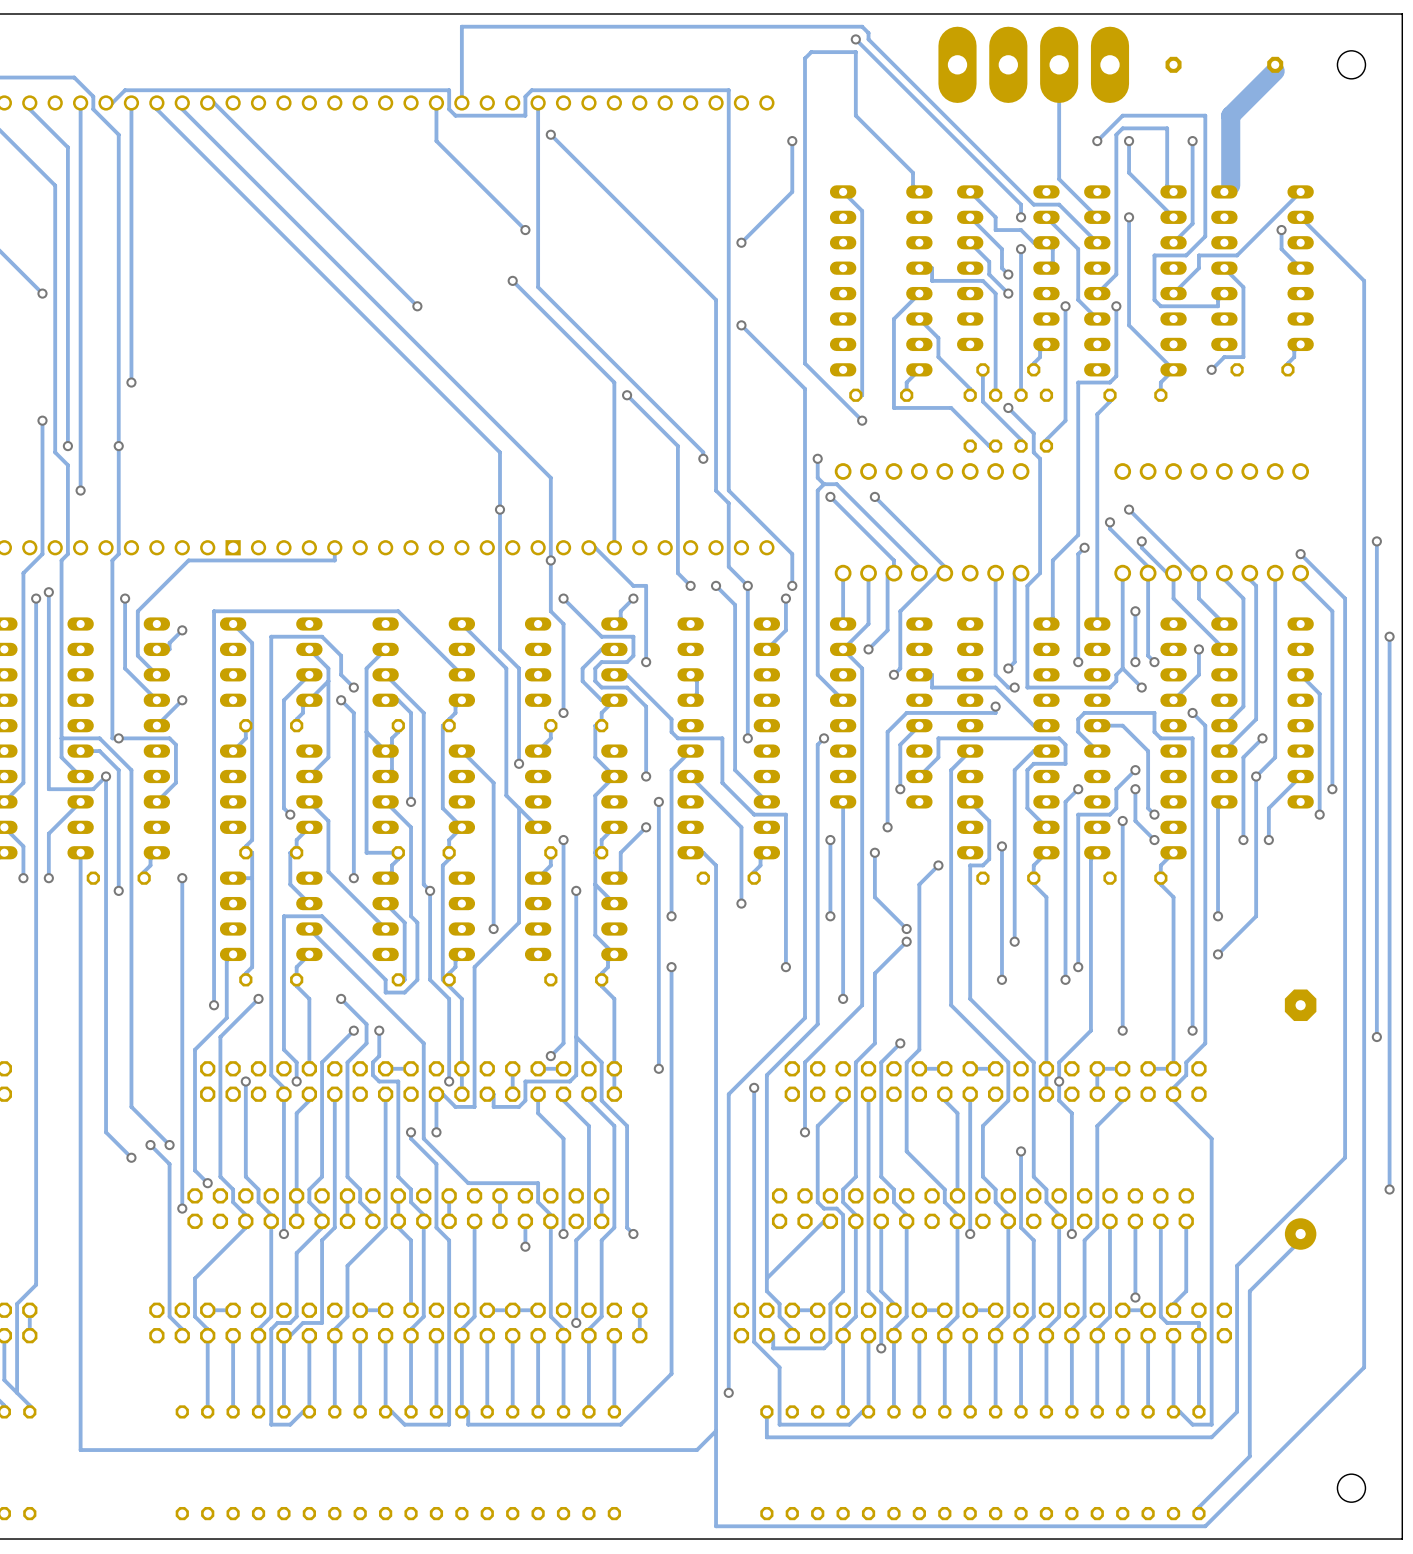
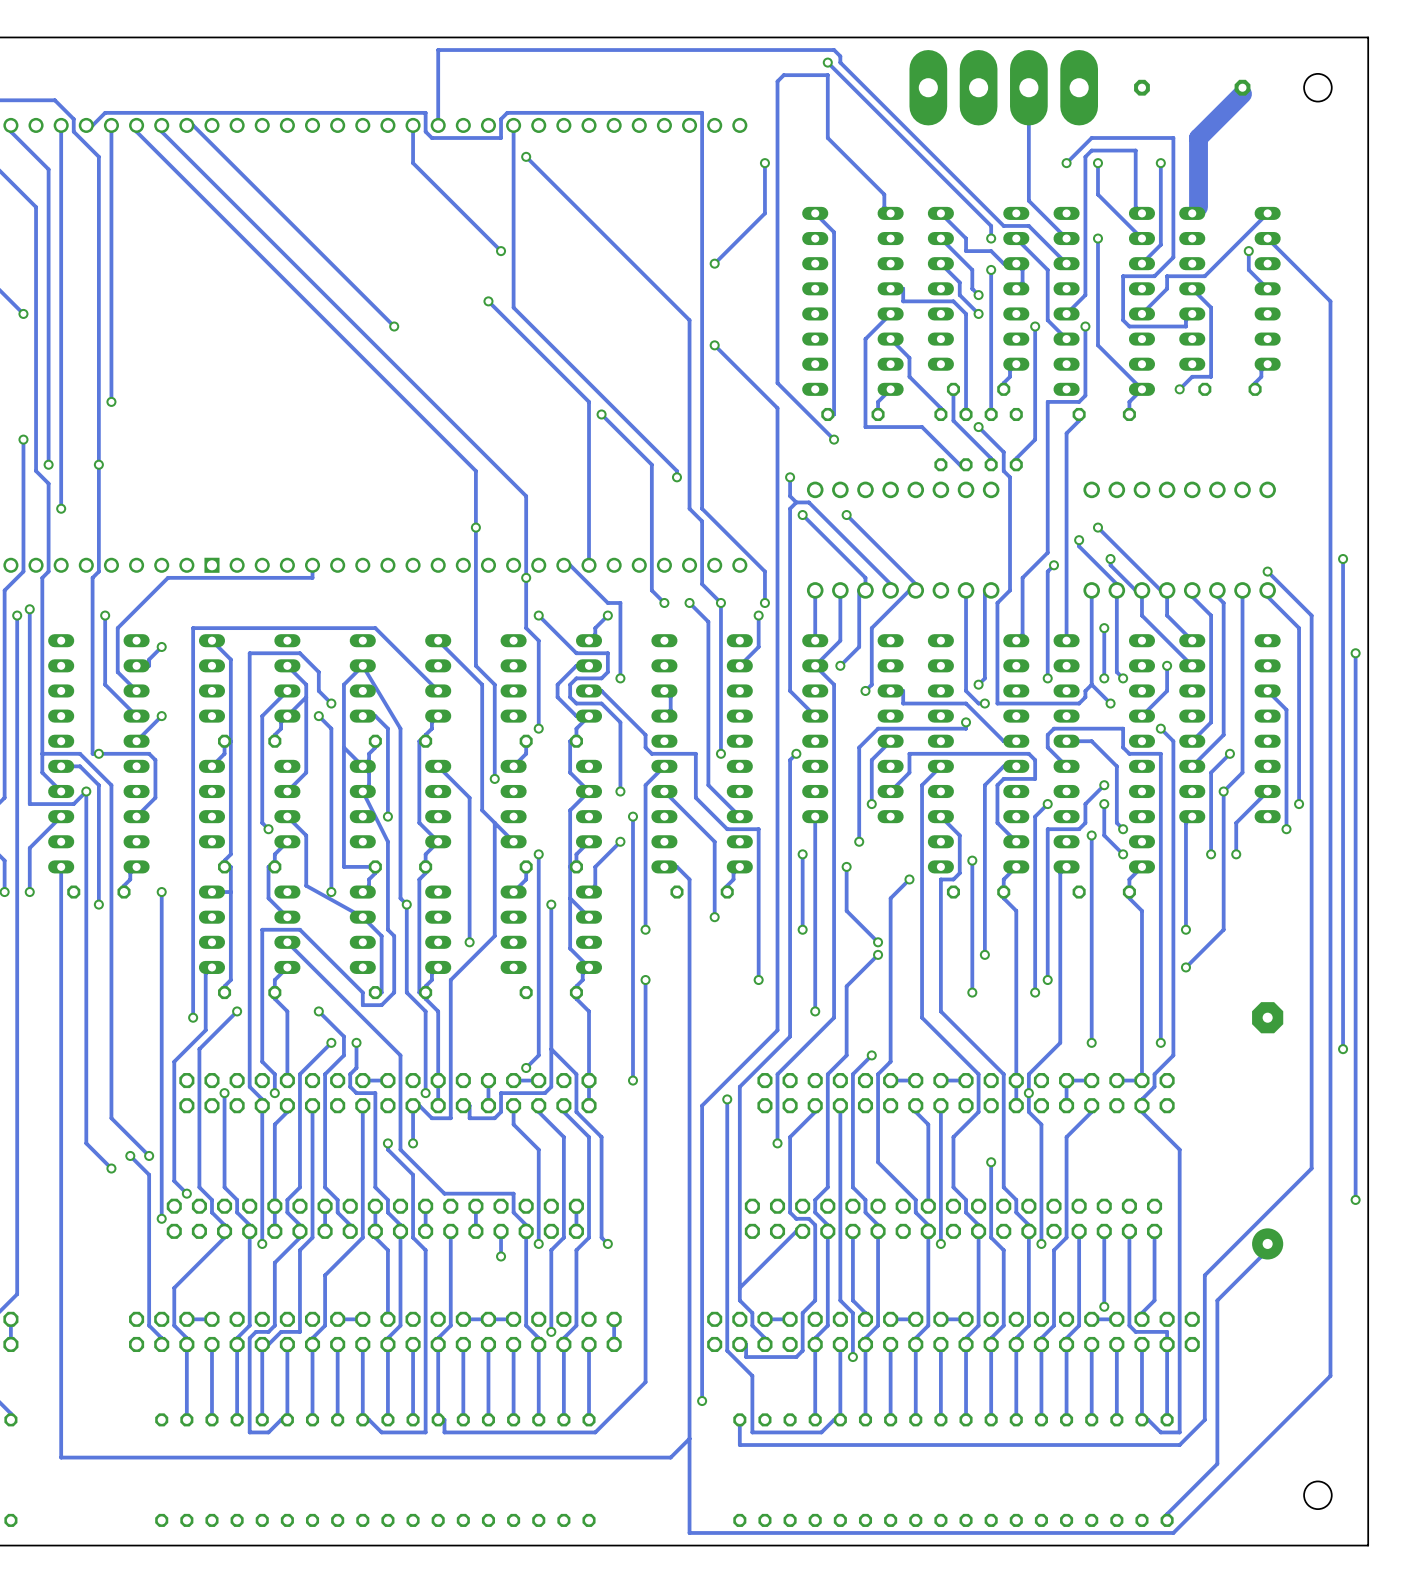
track: (385, 674) (423, 712) -> (362, 665) (400, 728)
track: (385, 801) (411, 827) -> (362, 791) (387, 841)
track: (328, 871) (385, 929) -> (306, 885) (362, 917)

